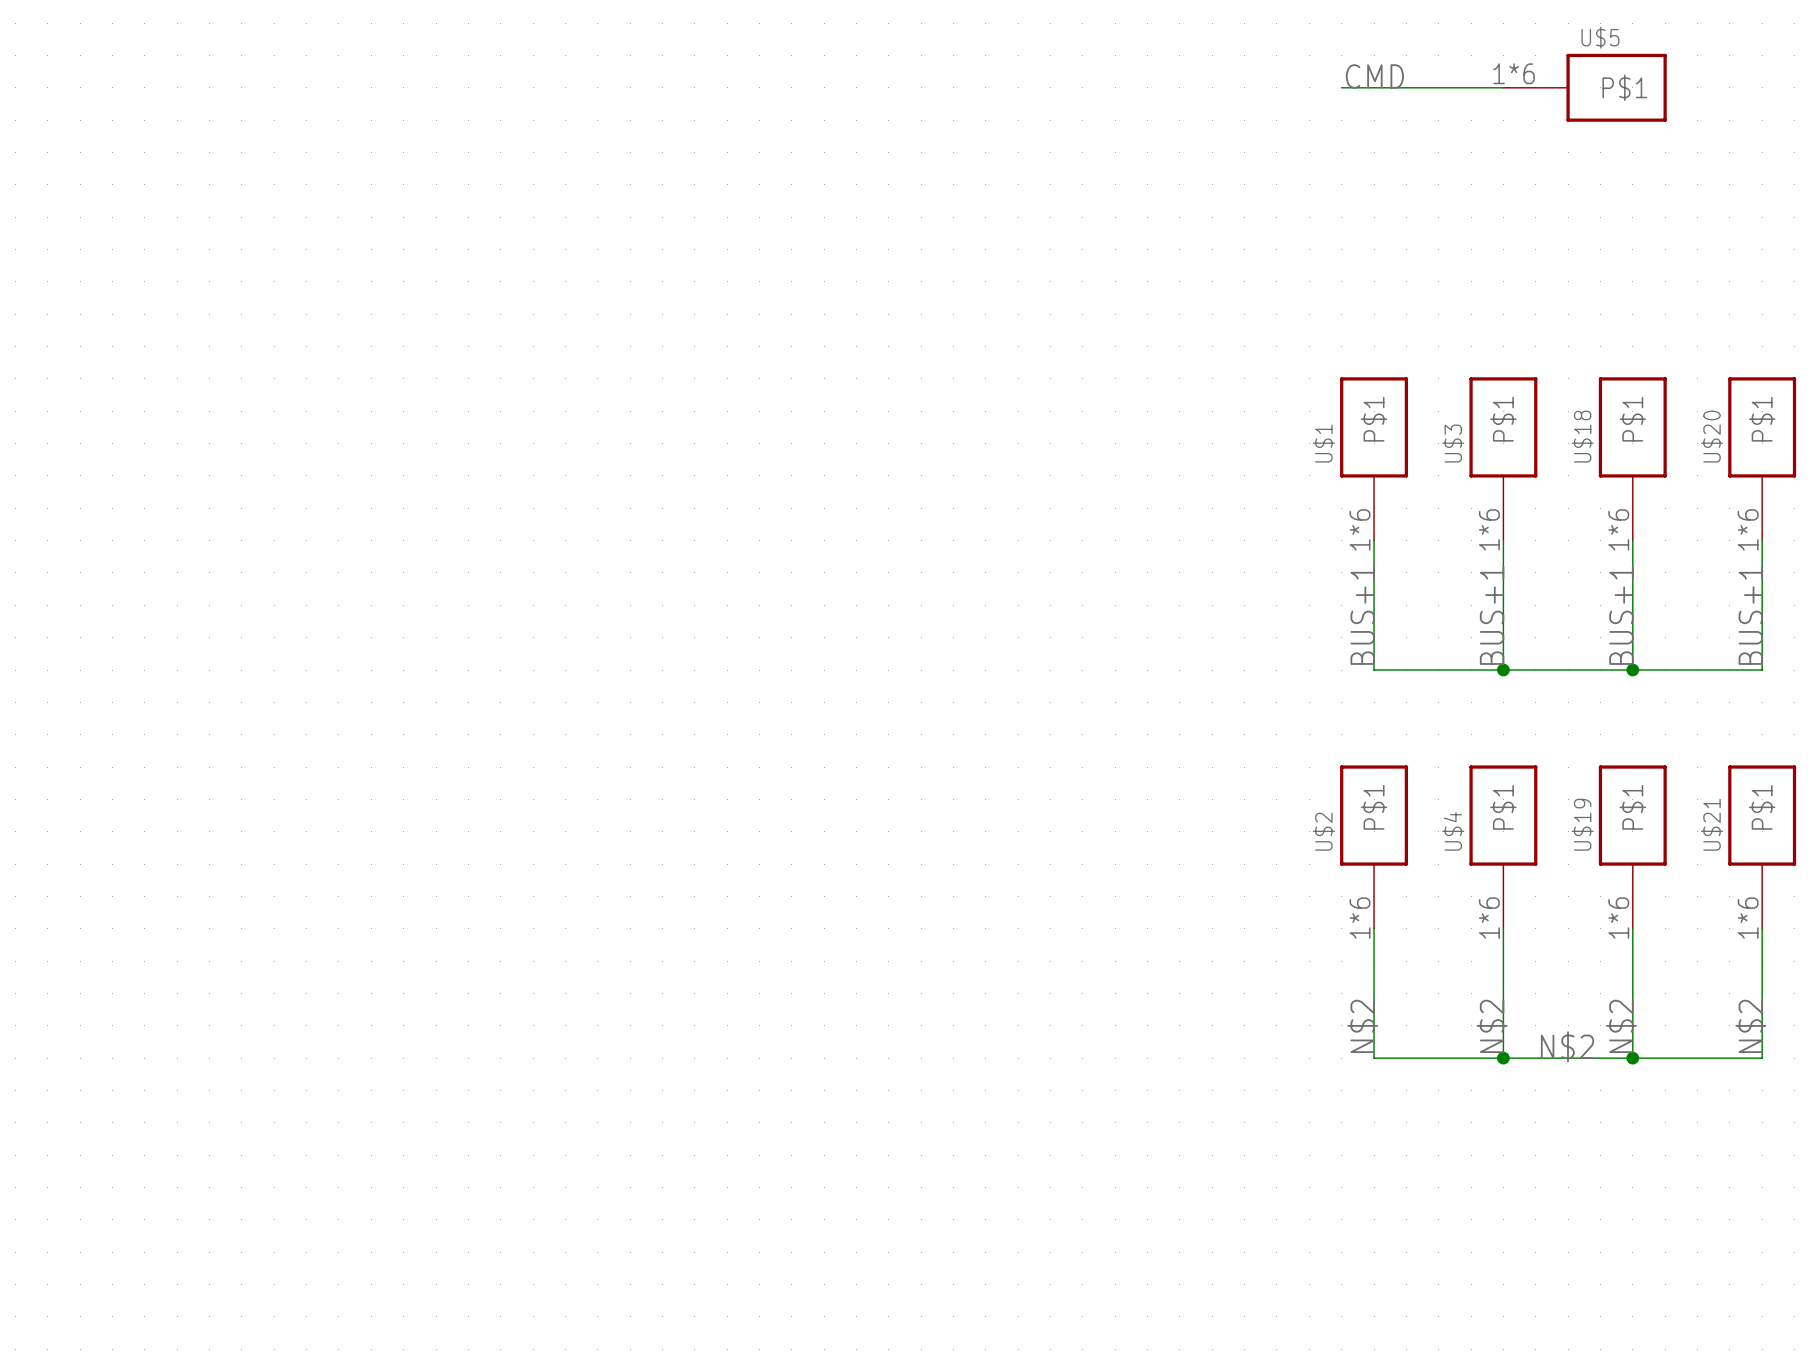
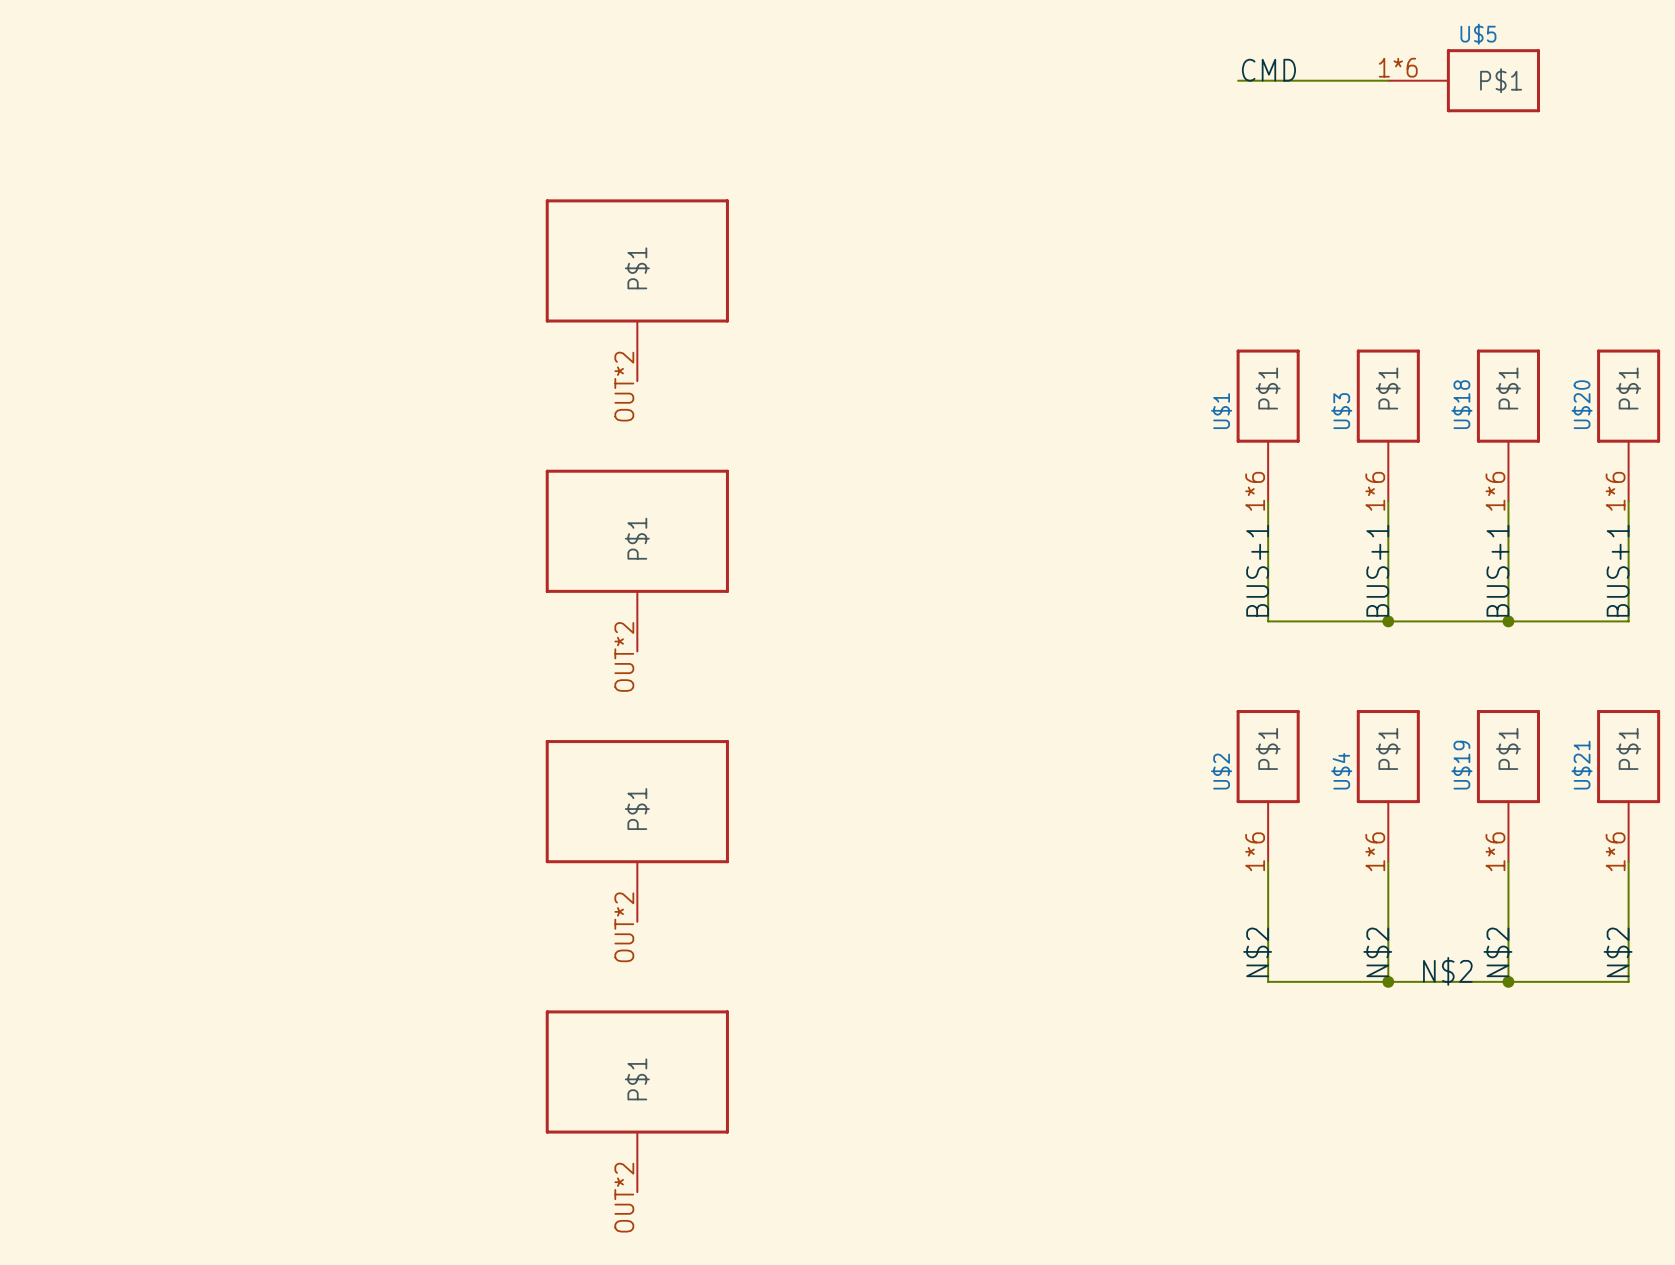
part: none -> (637, 290)
part: none -> (637, 560)
part: none -> (637, 830)
part: none -> (637, 1101)

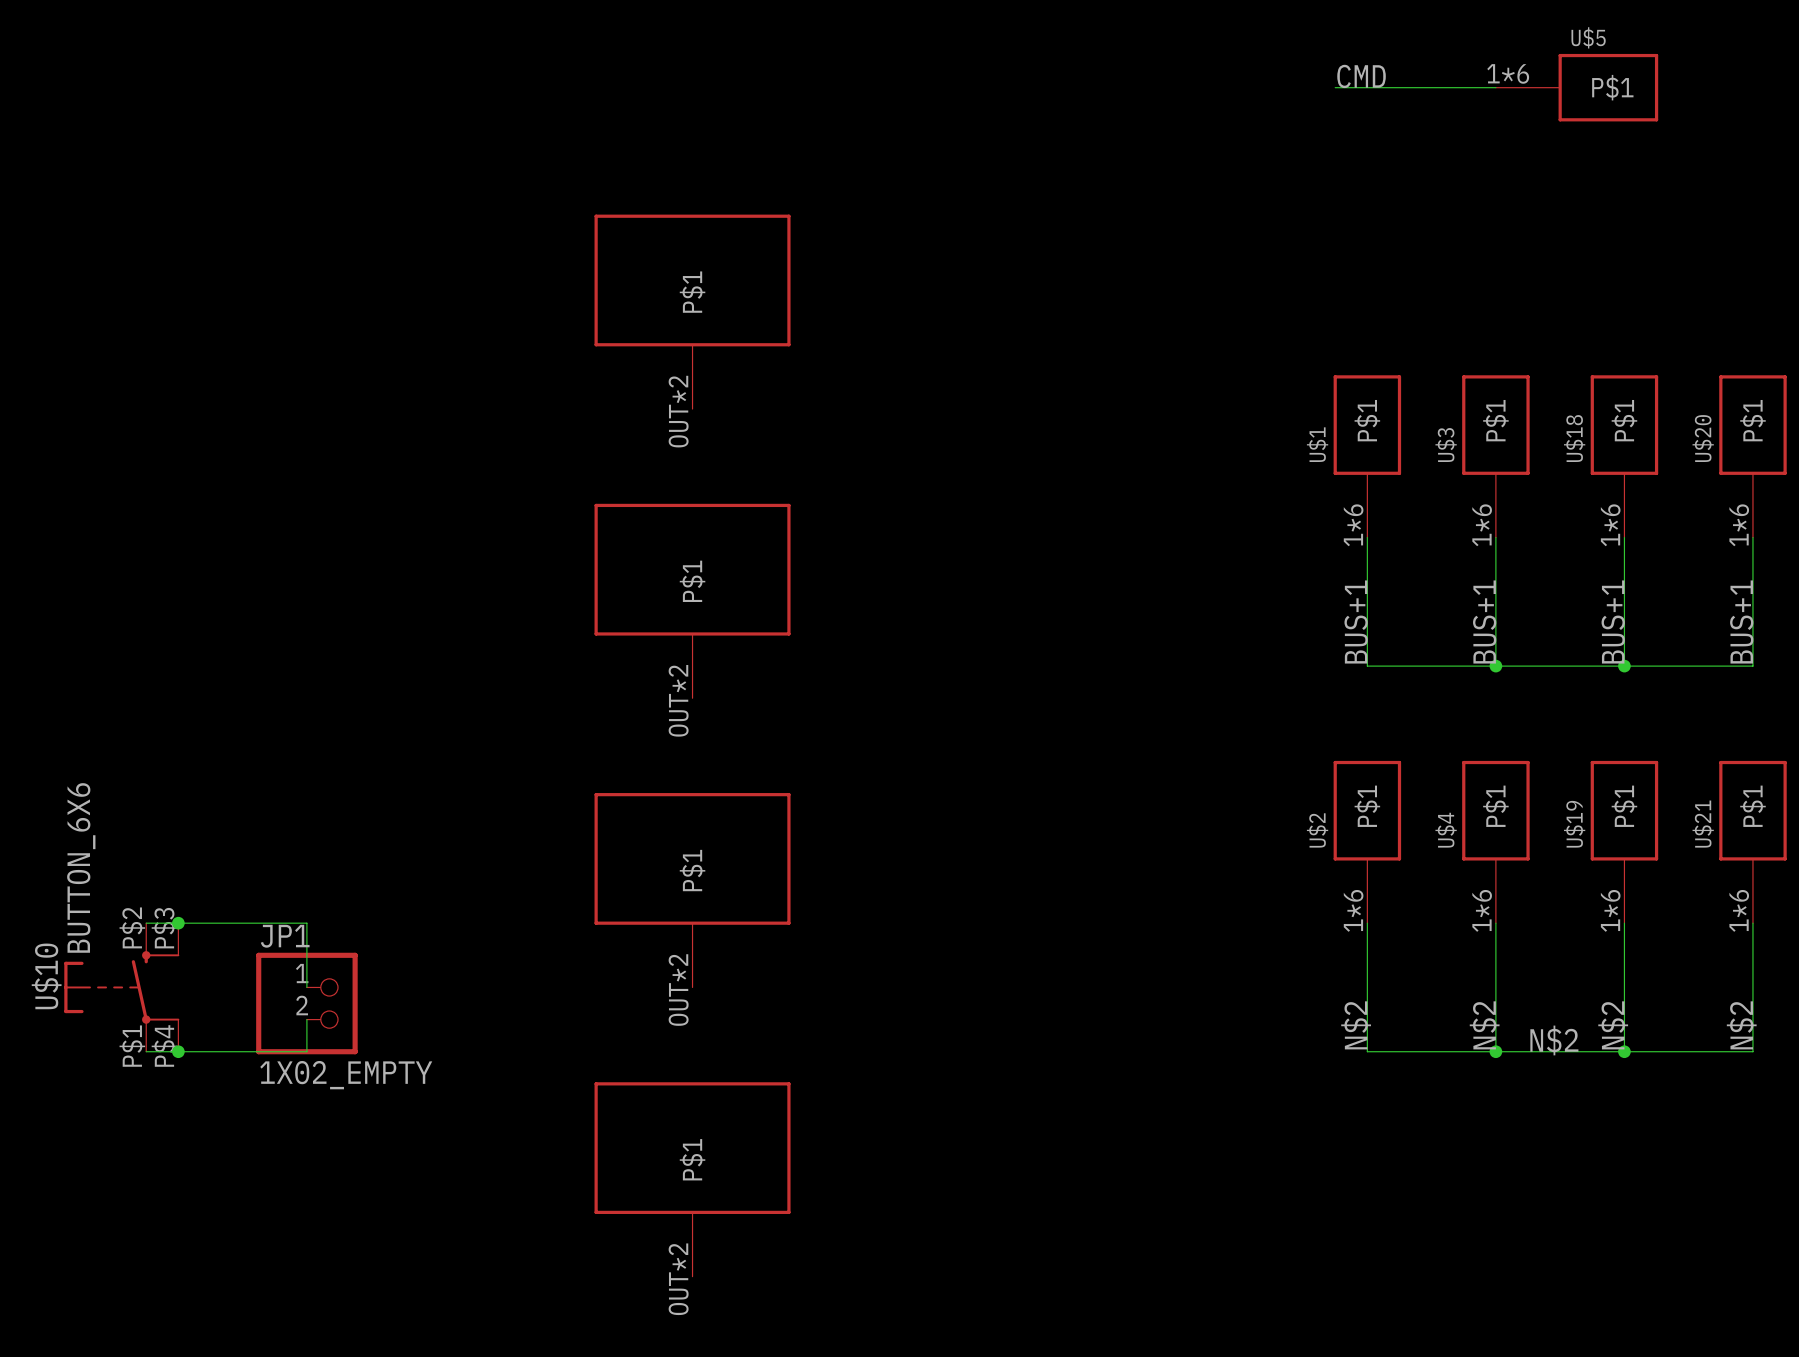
wire: none -> (146, 923) (306, 923) (306, 987)
junction: none -> (178, 923)
U$10: none -> BUTTON_6X6 (121, 987)
JP1: none -> 1X02_EMPTY (306, 1003)
wire: none -> (306, 1019) (306, 1051) (146, 1051)
junction: none -> (178, 1051)

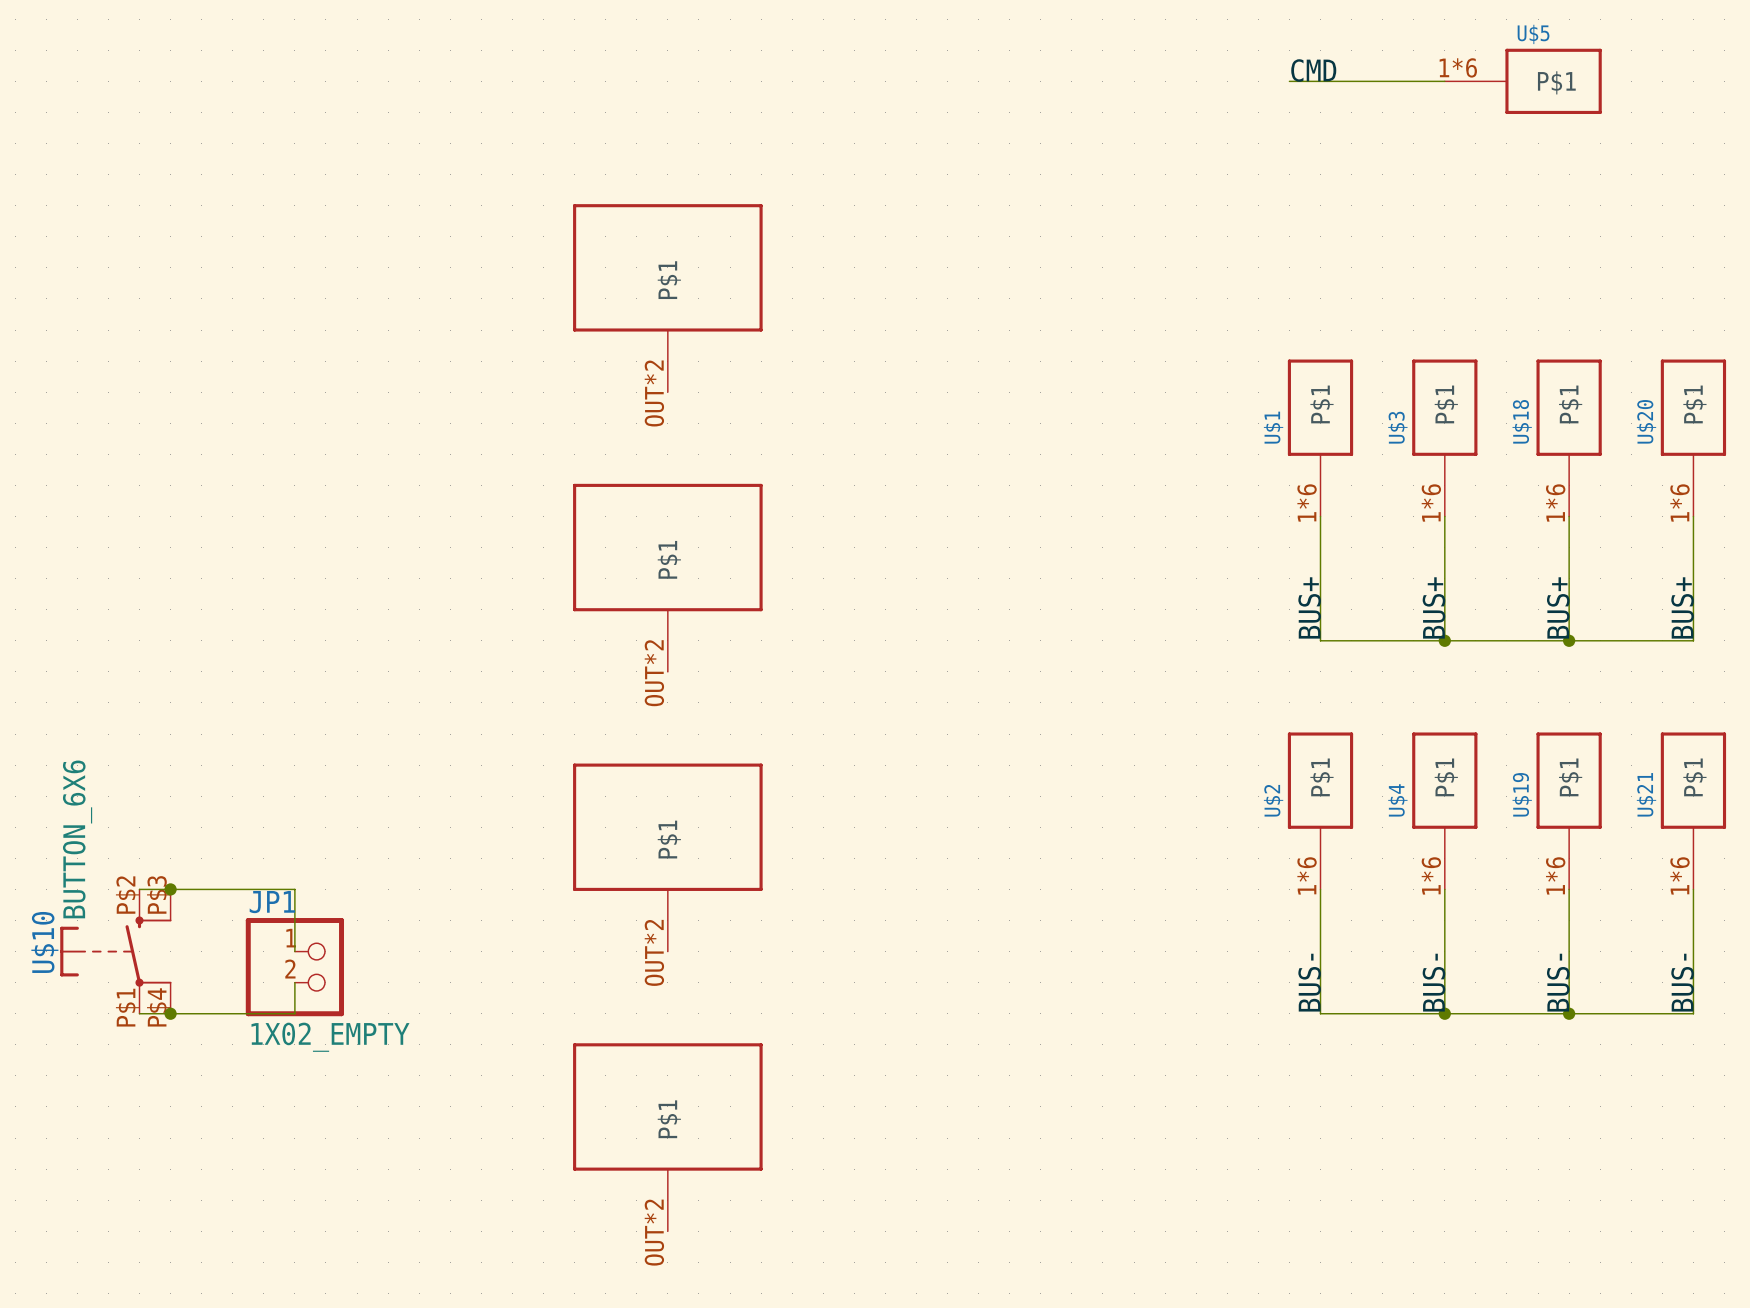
label: BUS+1 (1356, 622) -> BUS+ (1309, 607)
label: BUS+1 (1484, 622) -> BUS+ (1433, 607)
label: BUS+1 (1613, 622) -> BUS+ (1558, 607)
label: BUS+1 (1741, 622) -> BUS+ (1682, 607)
label: N$2 (1356, 1025) -> BUS- (1309, 982)
label: N$2 (1484, 1025) -> BUS- (1433, 982)
label: N$2 (1613, 1025) -> BUS- (1558, 982)
label: N$2 (1741, 1025) -> BUS- (1682, 982)
label: N$2 (1554, 1040) -> none

